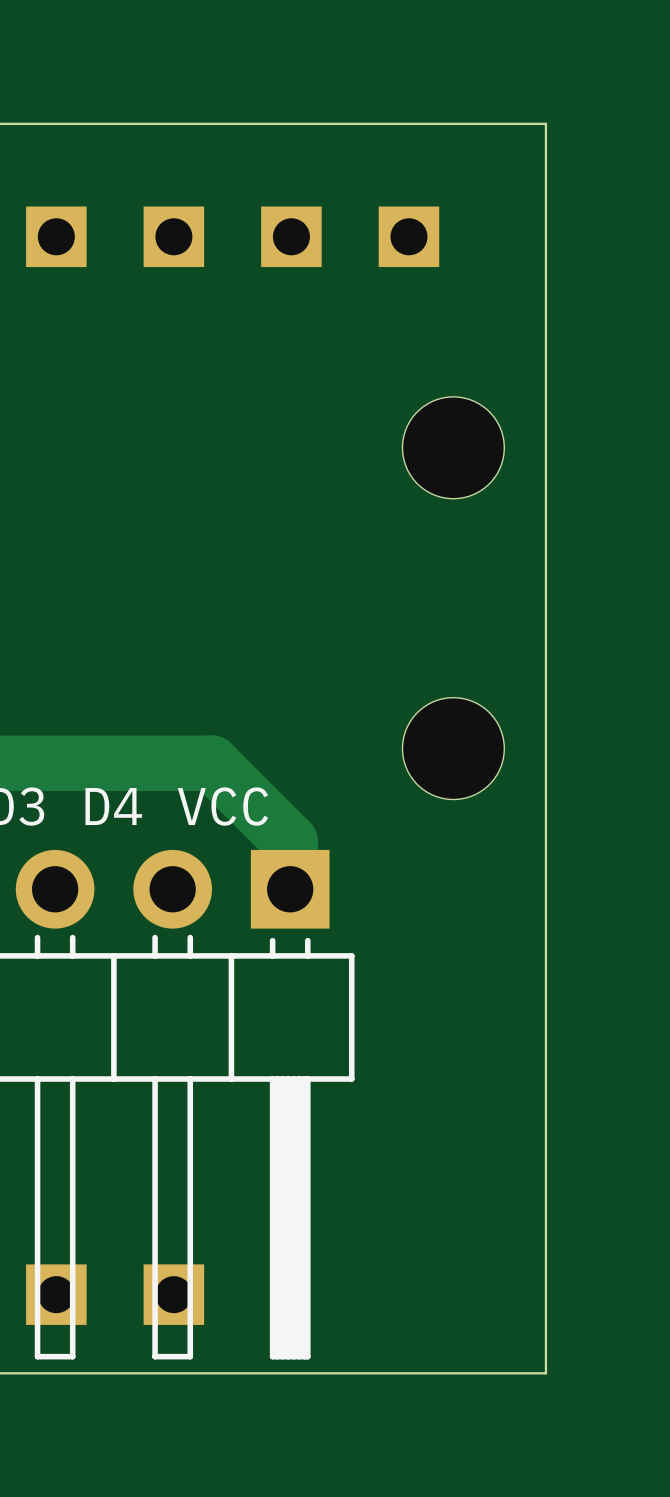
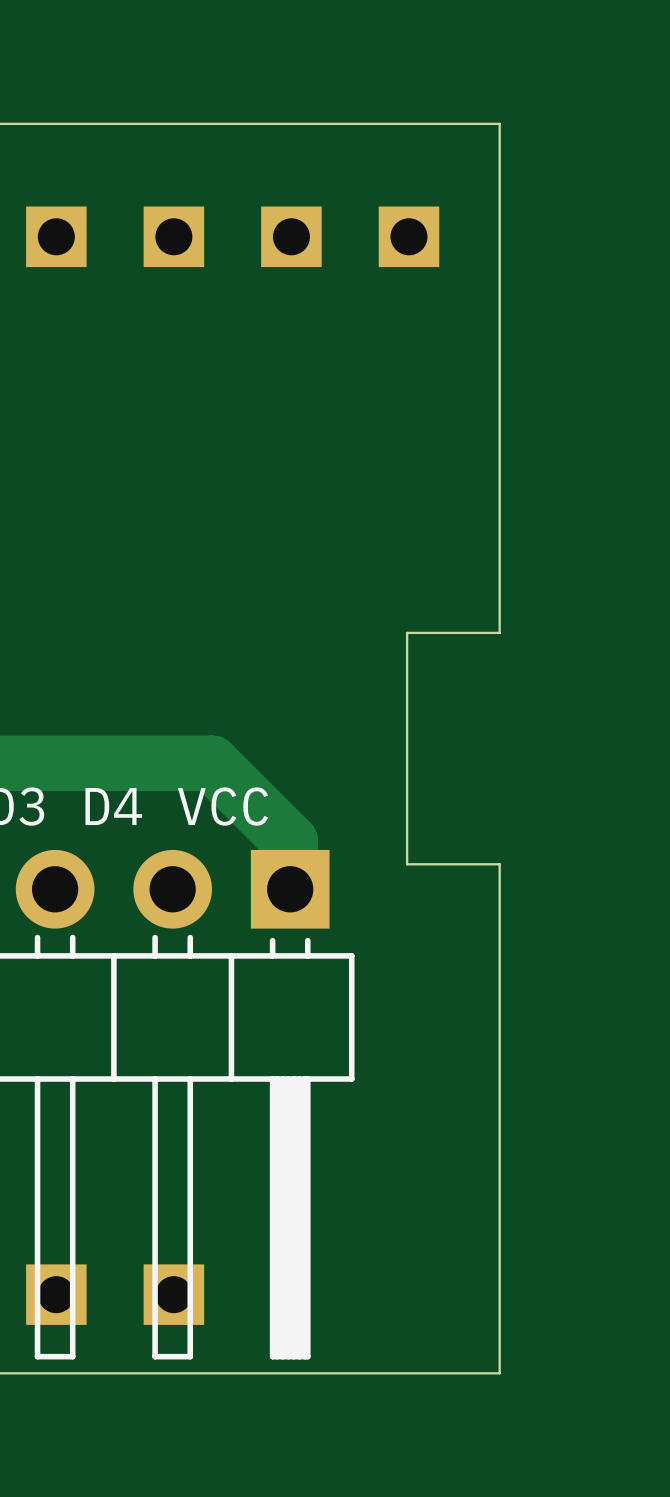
board edge: (499, 123) (545, 123) (545, 1373) (499, 1373) -> (499, 123) (499, 632) (407, 632) (407, 864) (499, 864) (499, 1373)
part: (453, 447) -> none
part: (453, 748) -> none

